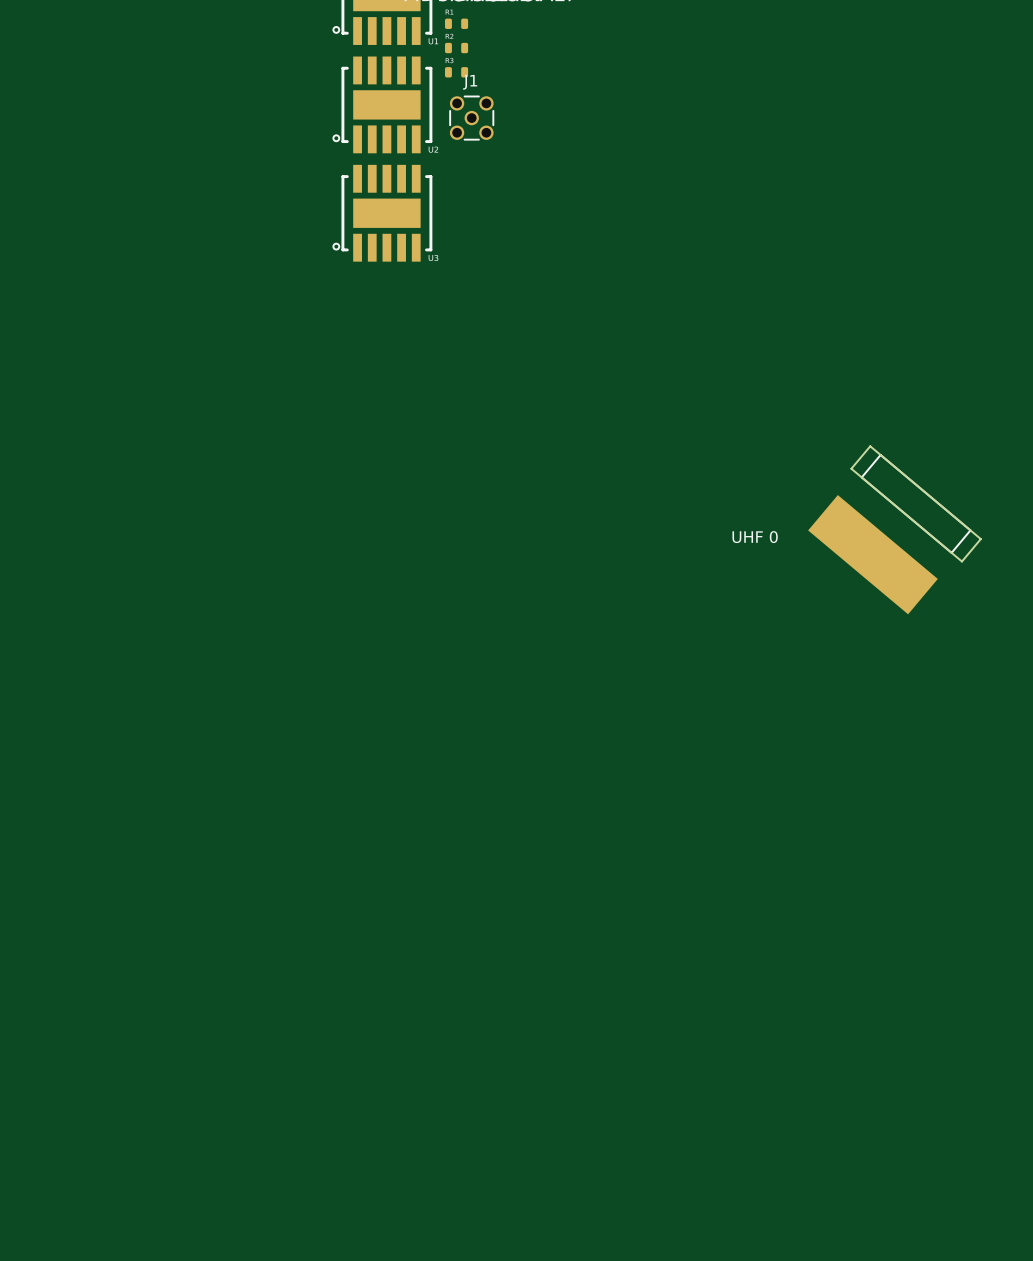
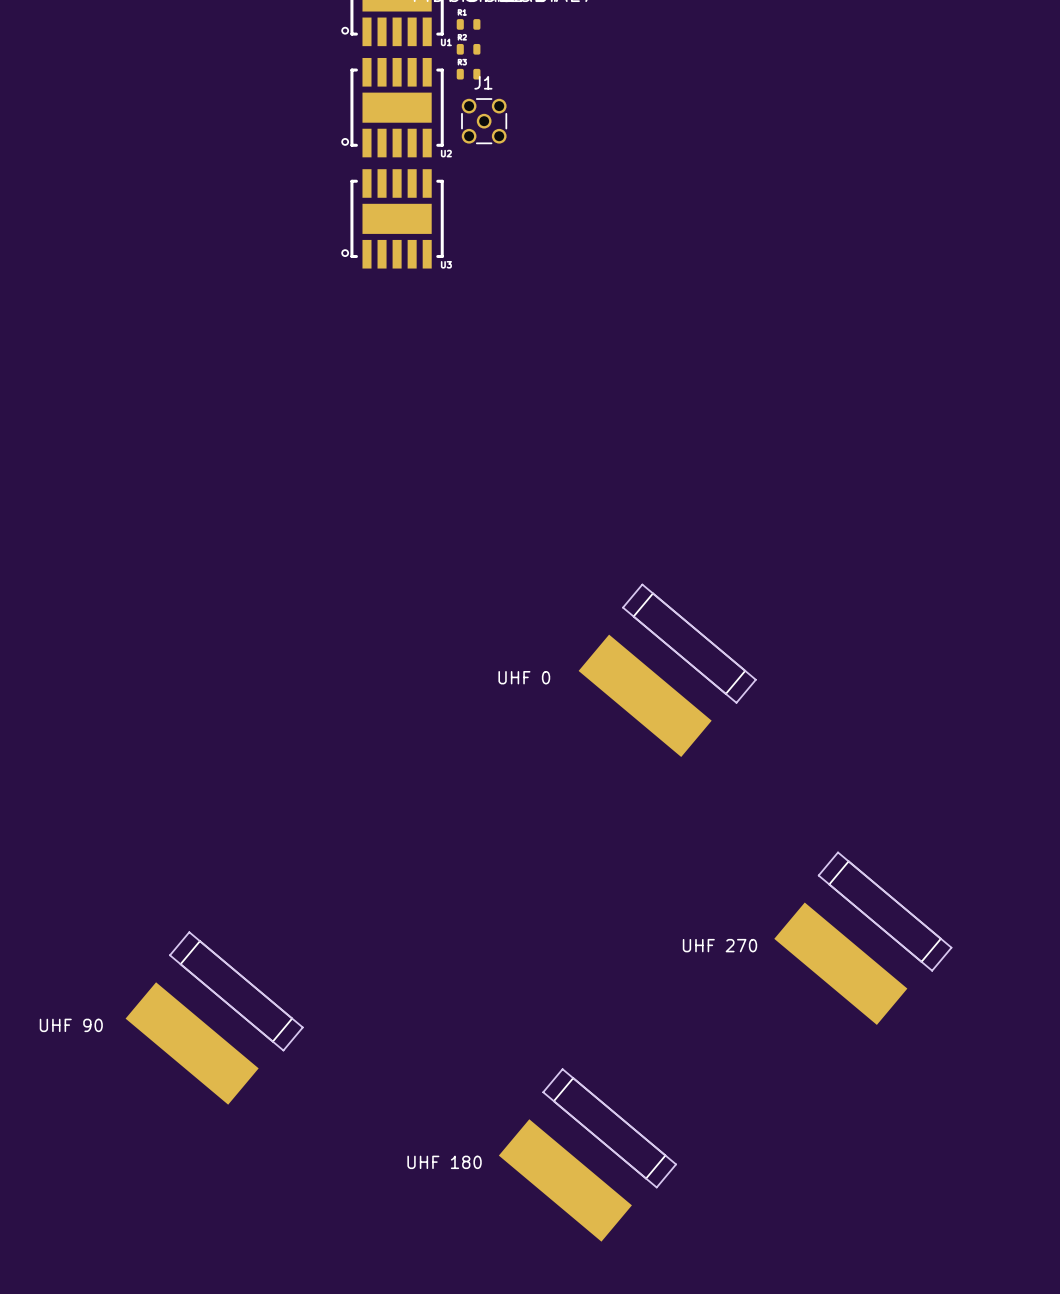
UHF 0 position: (894, 530) -> (667, 670)
UHF 270: none -> (863, 938)
UHF 90: none -> (214, 1018)
UHF 180: none -> (587, 1155)

